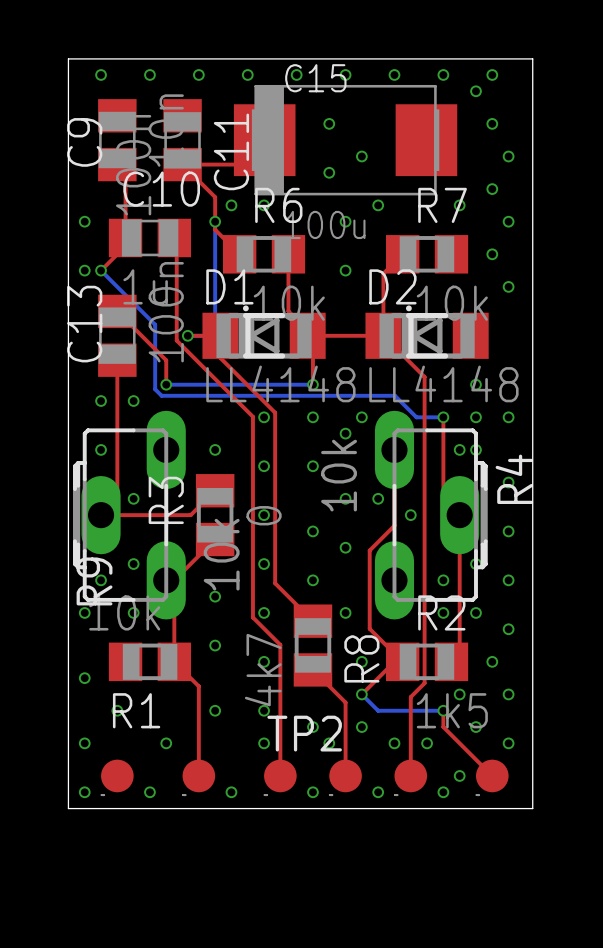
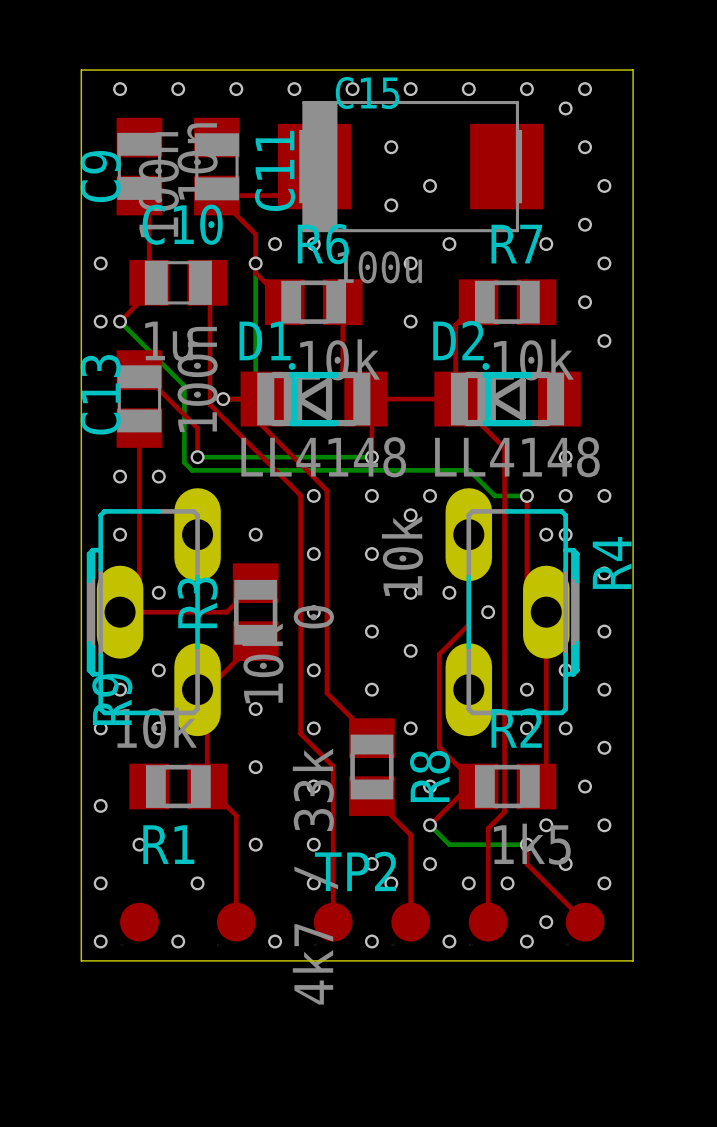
R8 value: 4k7 (263, 670) -> 4k7 / 33k (315, 876)

